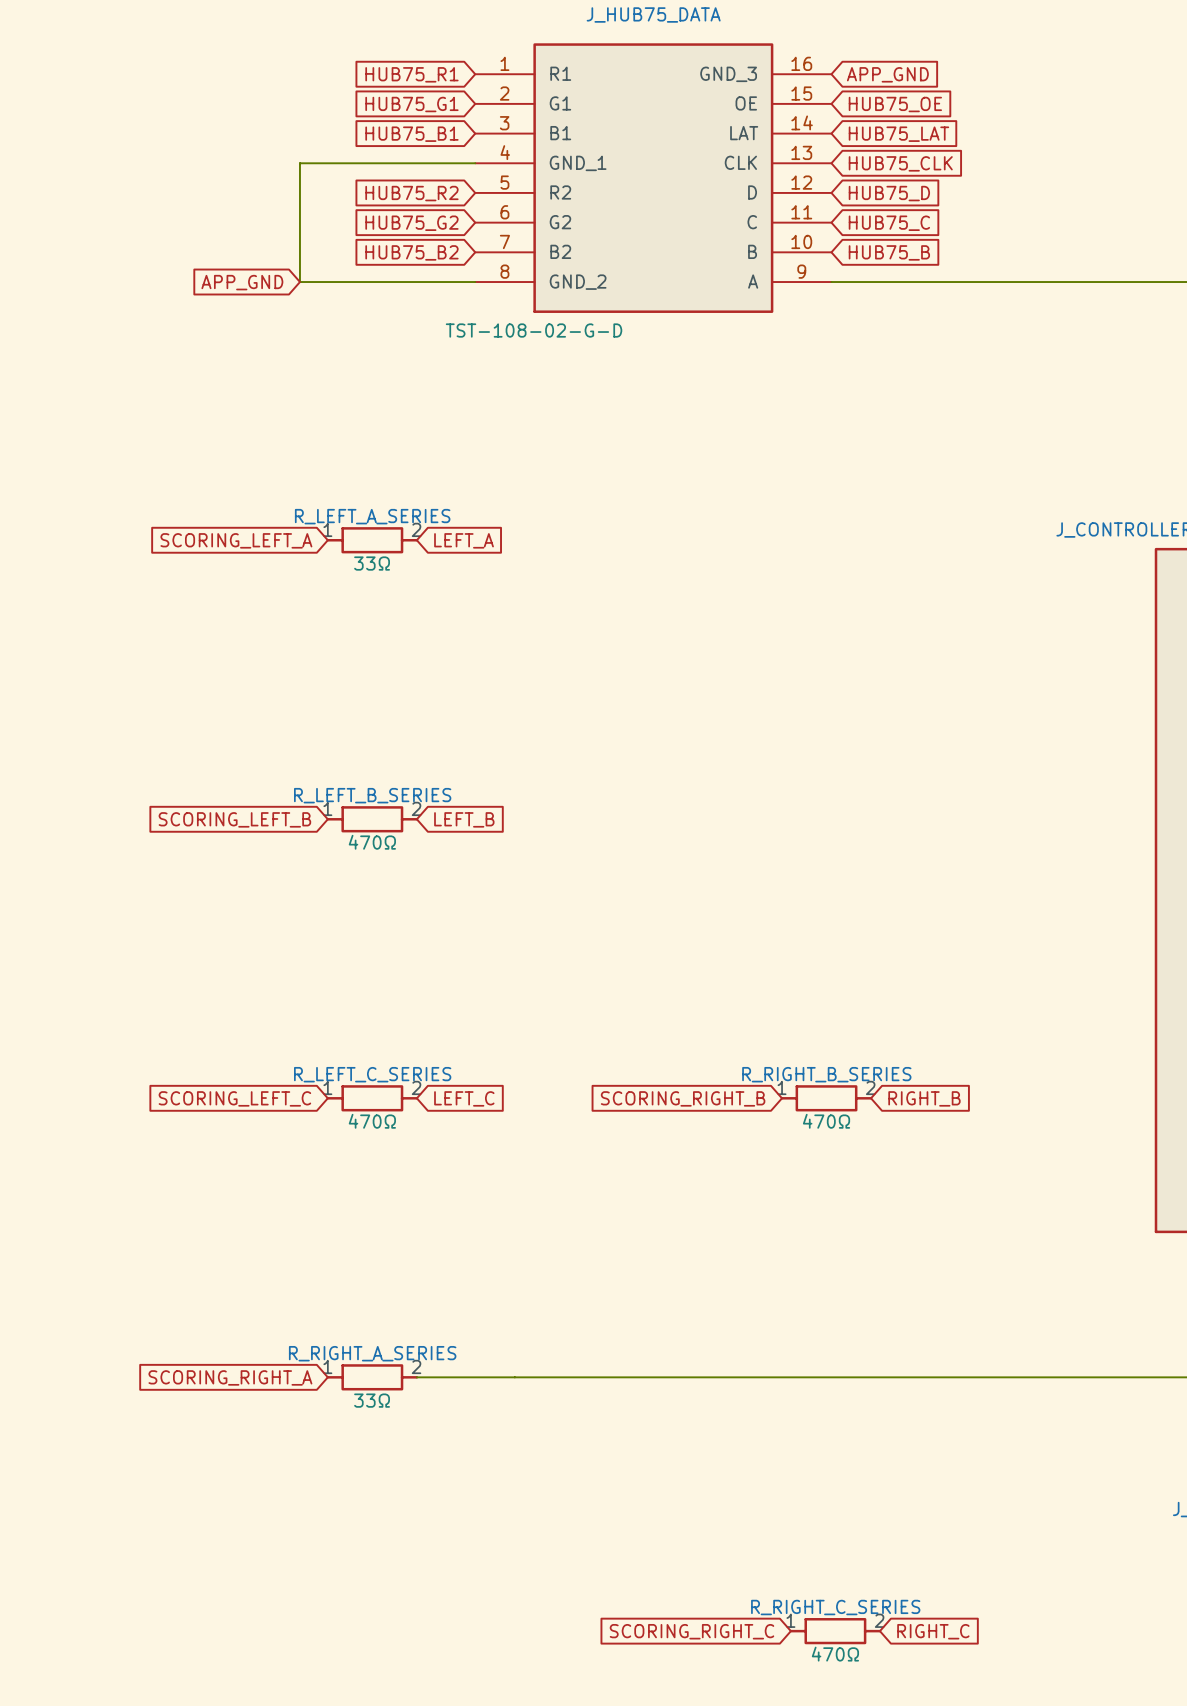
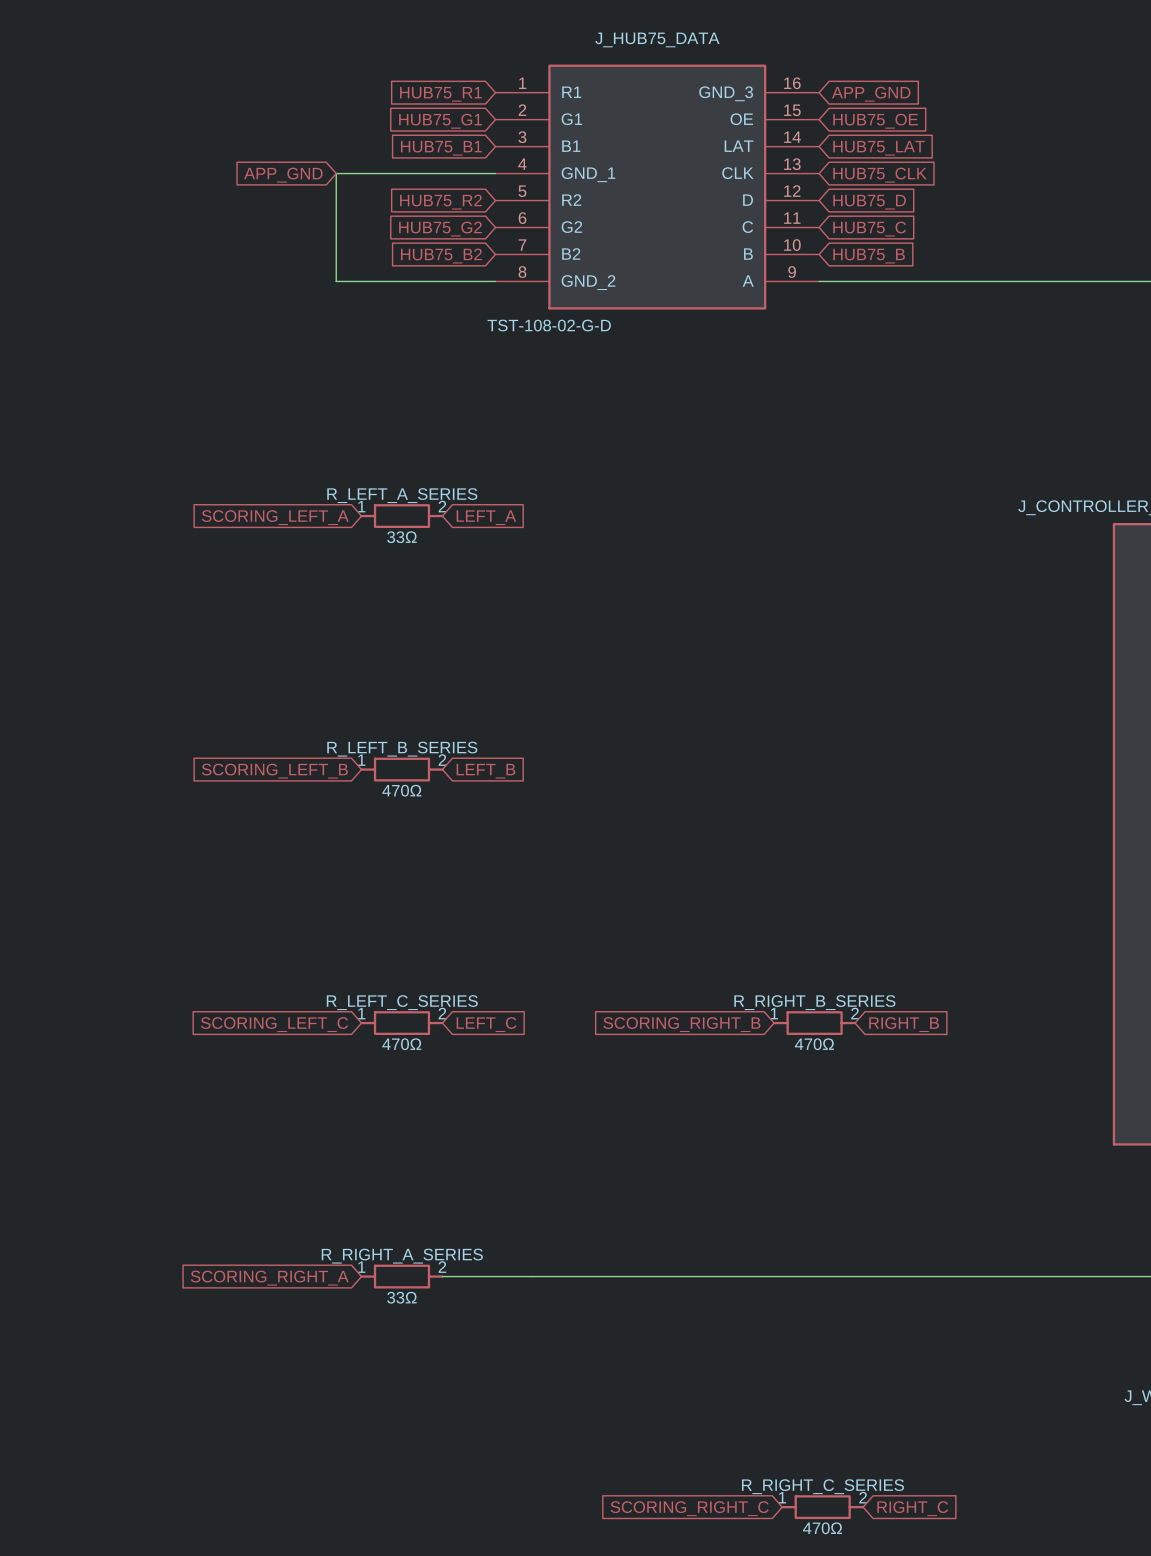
global label position: APP_GND (242, 282) -> APP_GND (283, 175)

